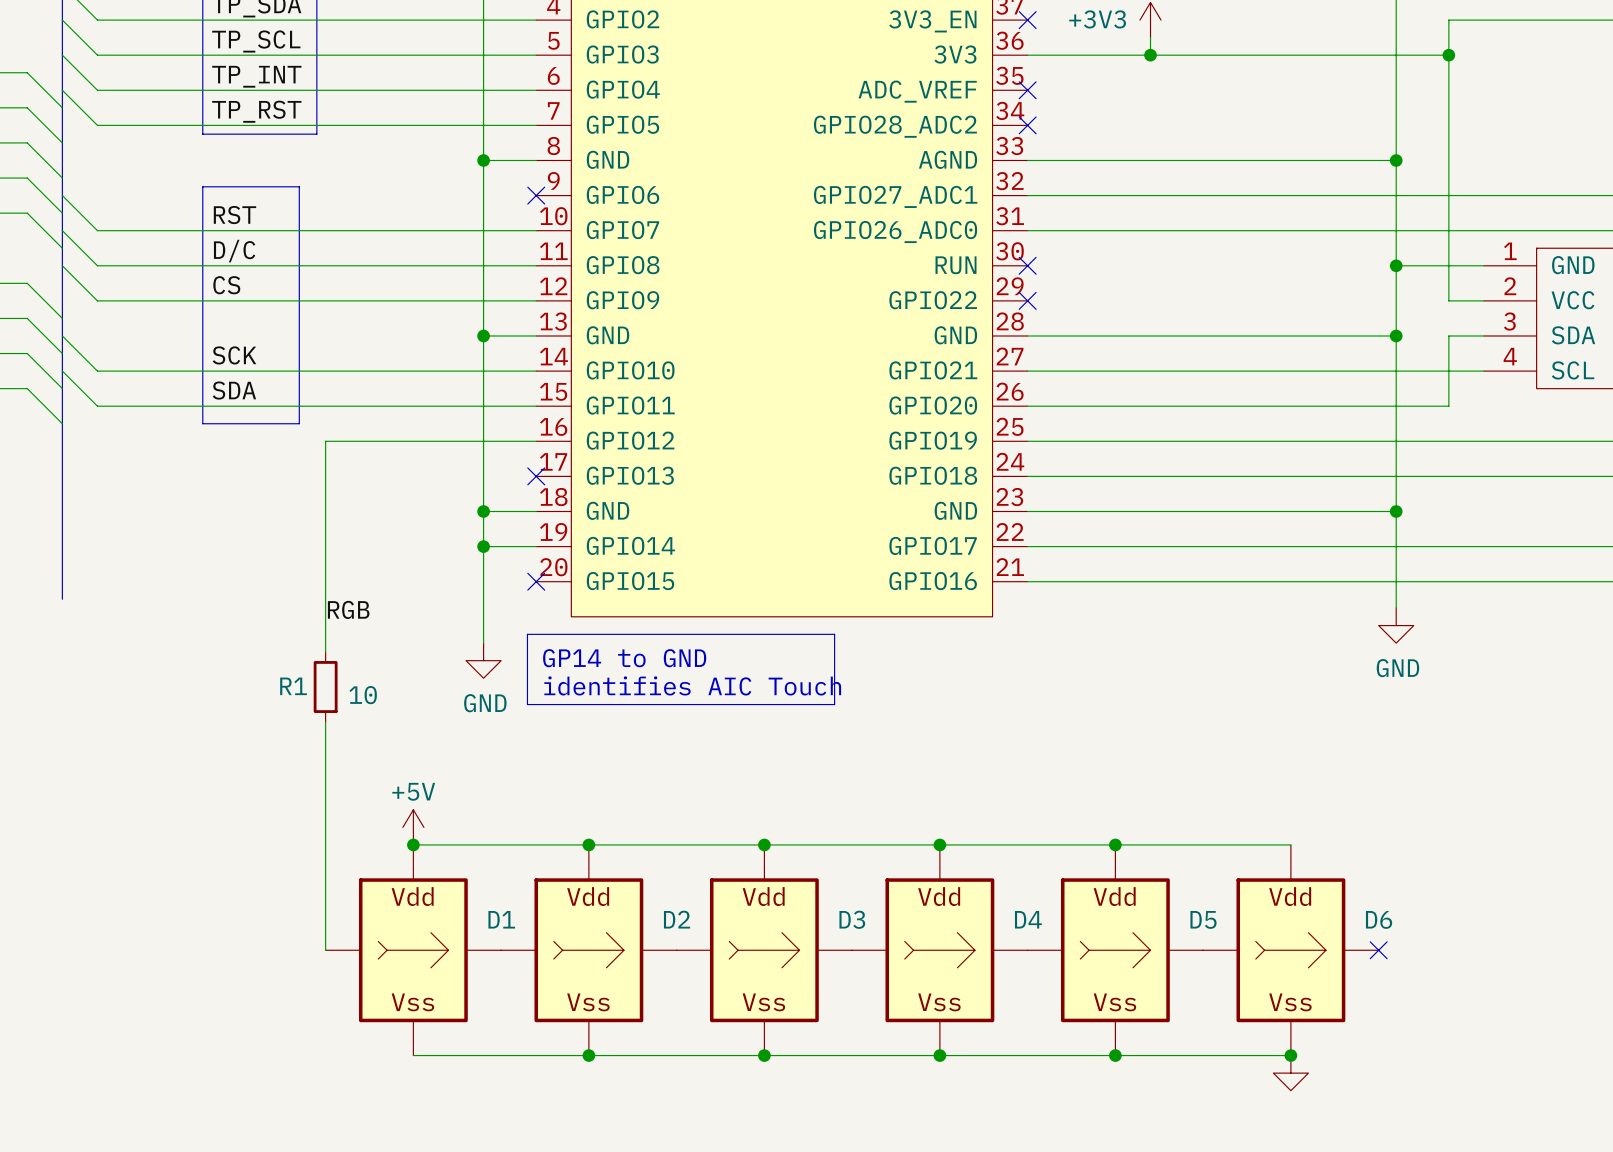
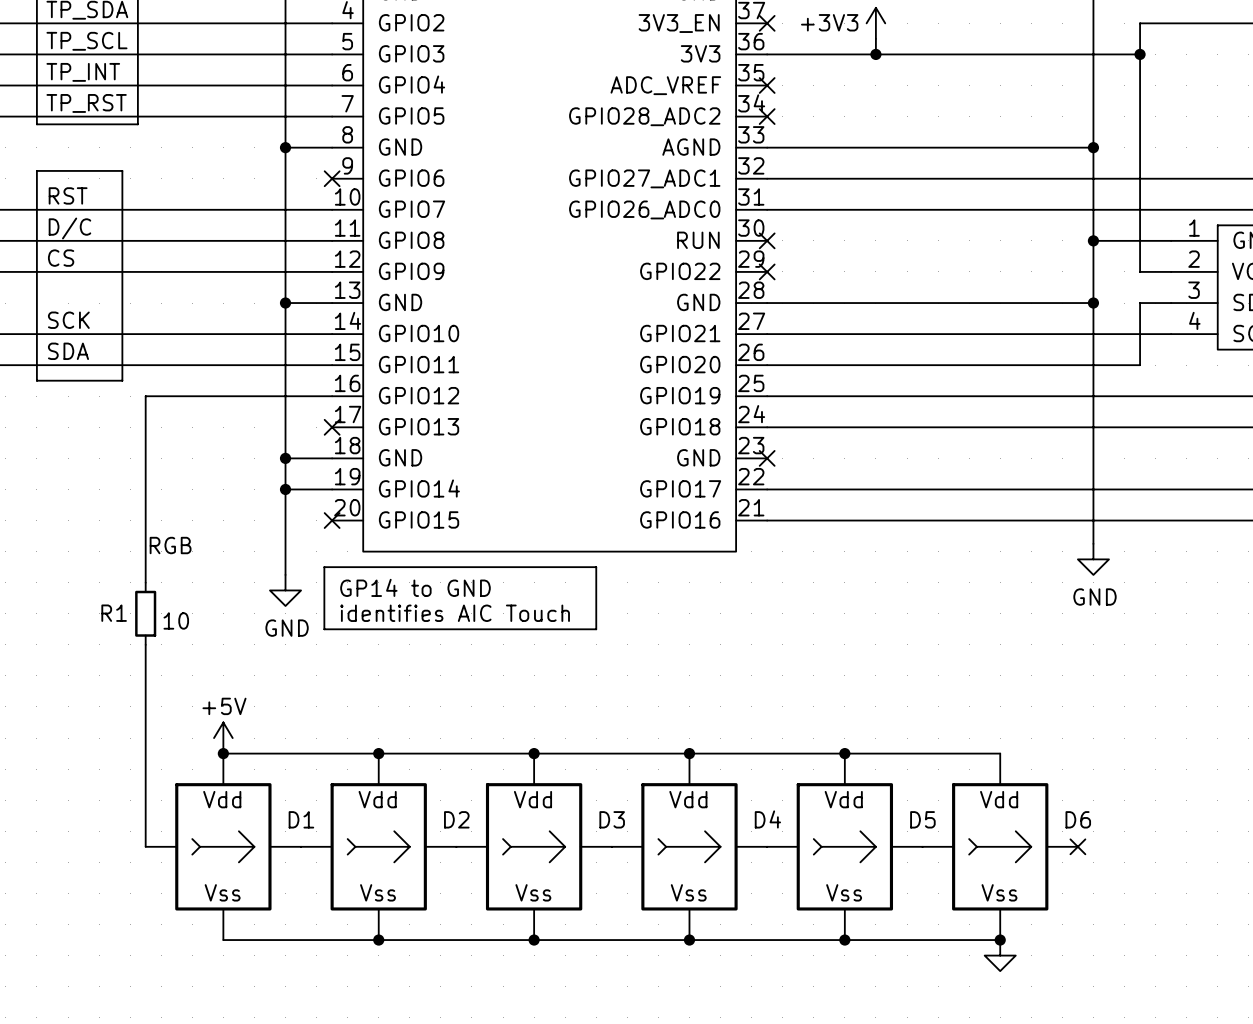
wire: (1027, 511) (1396, 511) -> none
no-connect mark: none -> (767, 458)
junction: (1396, 511) -> none

